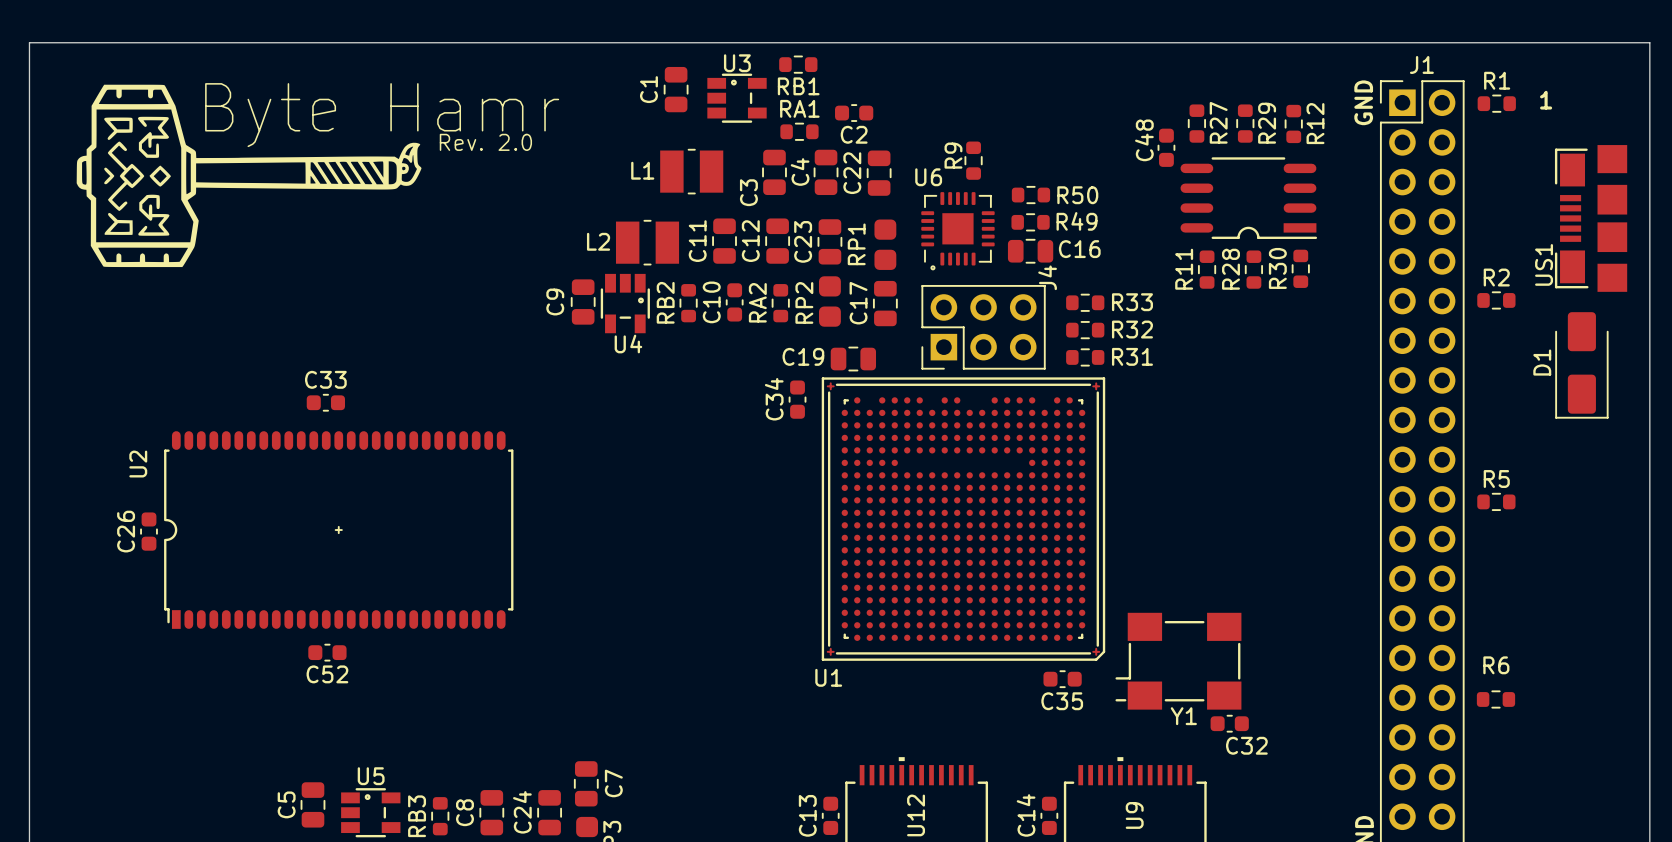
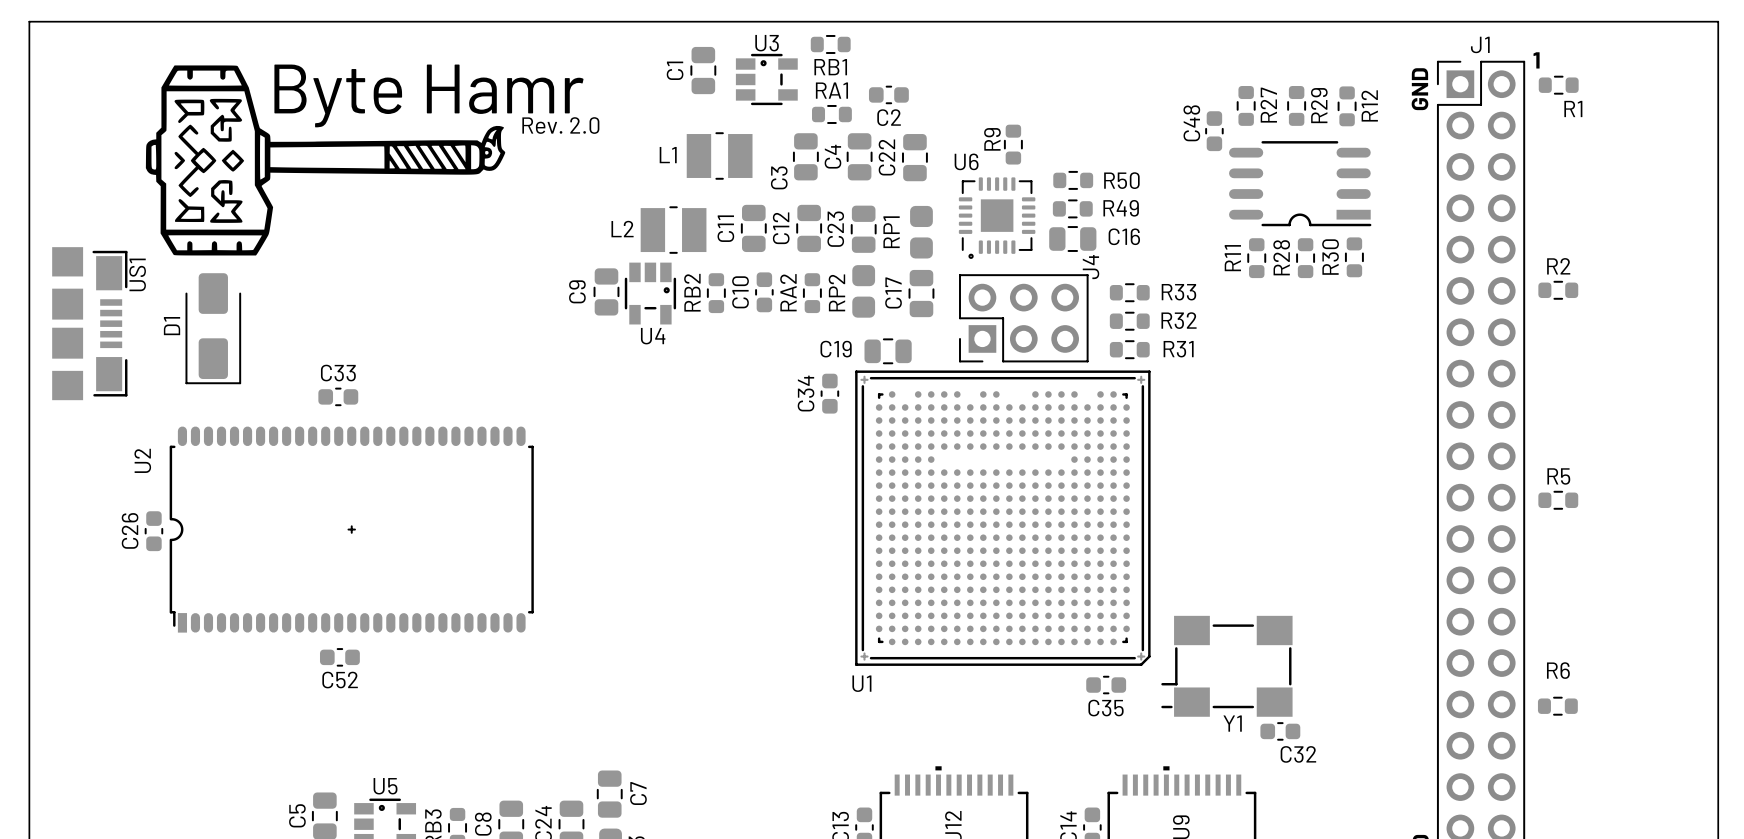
R1 name position: R1 (1497, 80) -> R1 (1573, 108)
text position: 1 (1546, 100) -> 1 (1536, 60)
text position: Byte Hamr (382, 115) -> Byte Hamr (429, 95)
text position: Rev. 2.0 (485, 142) -> Rev. 2.0 (560, 125)
drawing position: (249, 175) -> (325, 160)
US1 rotation: 0° (1591, 218) -> 180° (89, 323)
US1 position: (1591, 218) -> (89, 323)
D1 position: (1581, 365) -> (213, 328)

